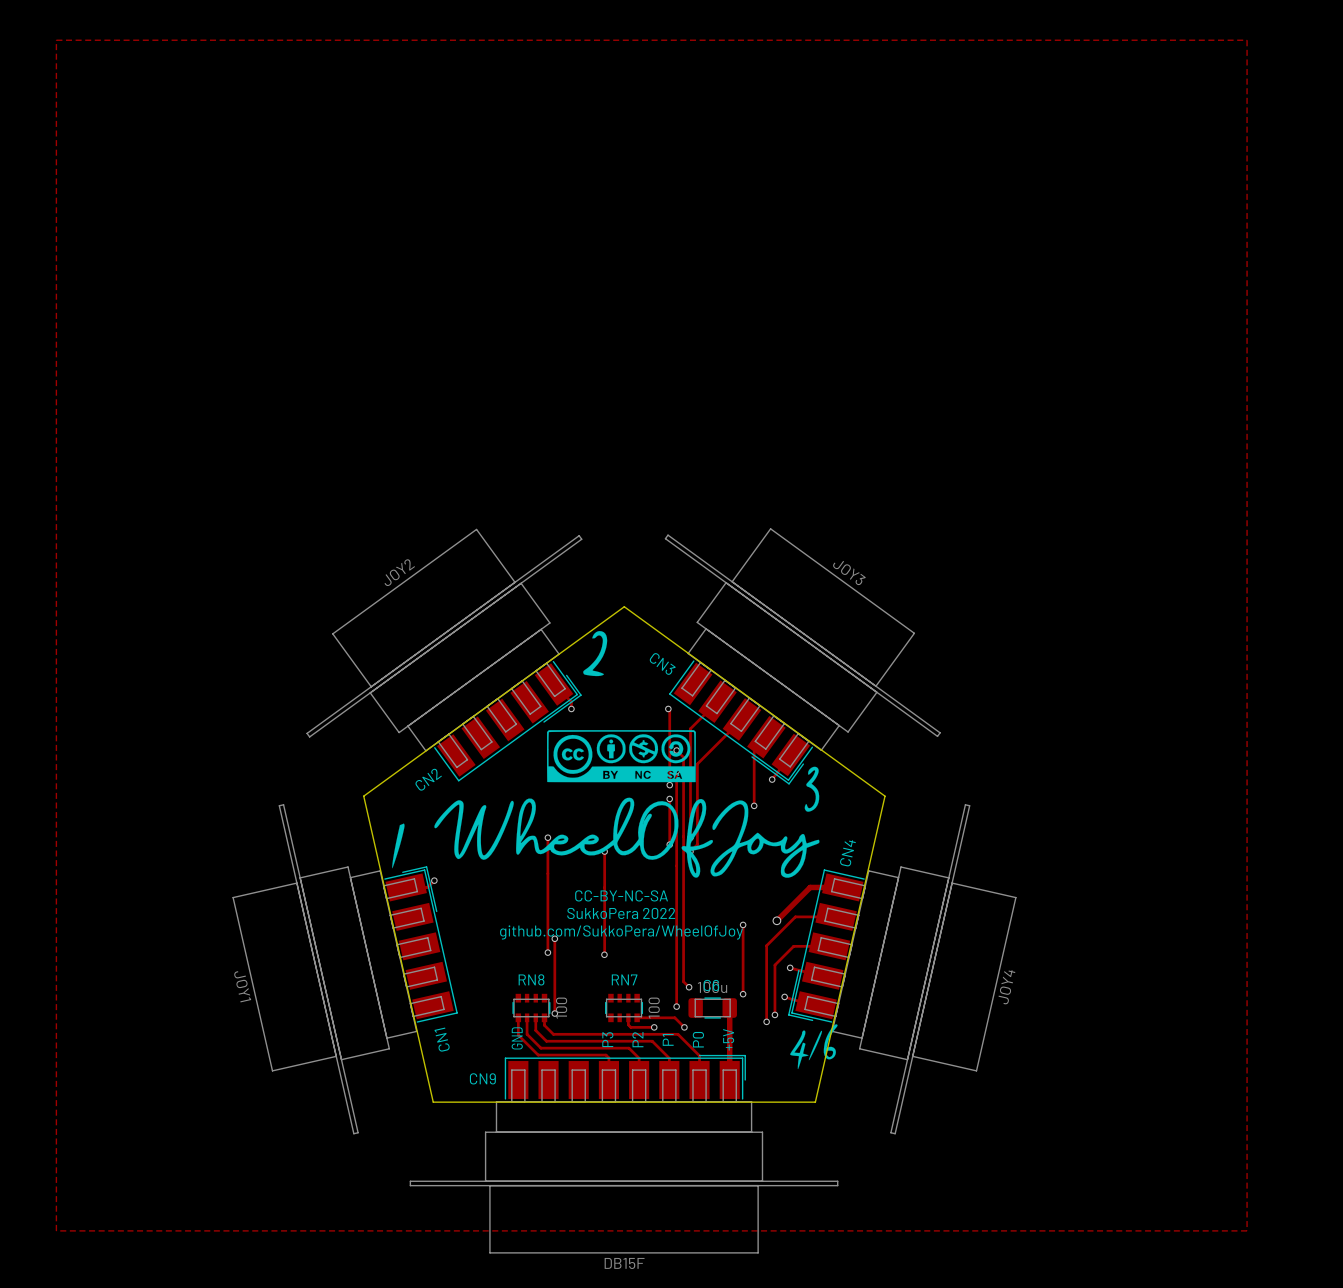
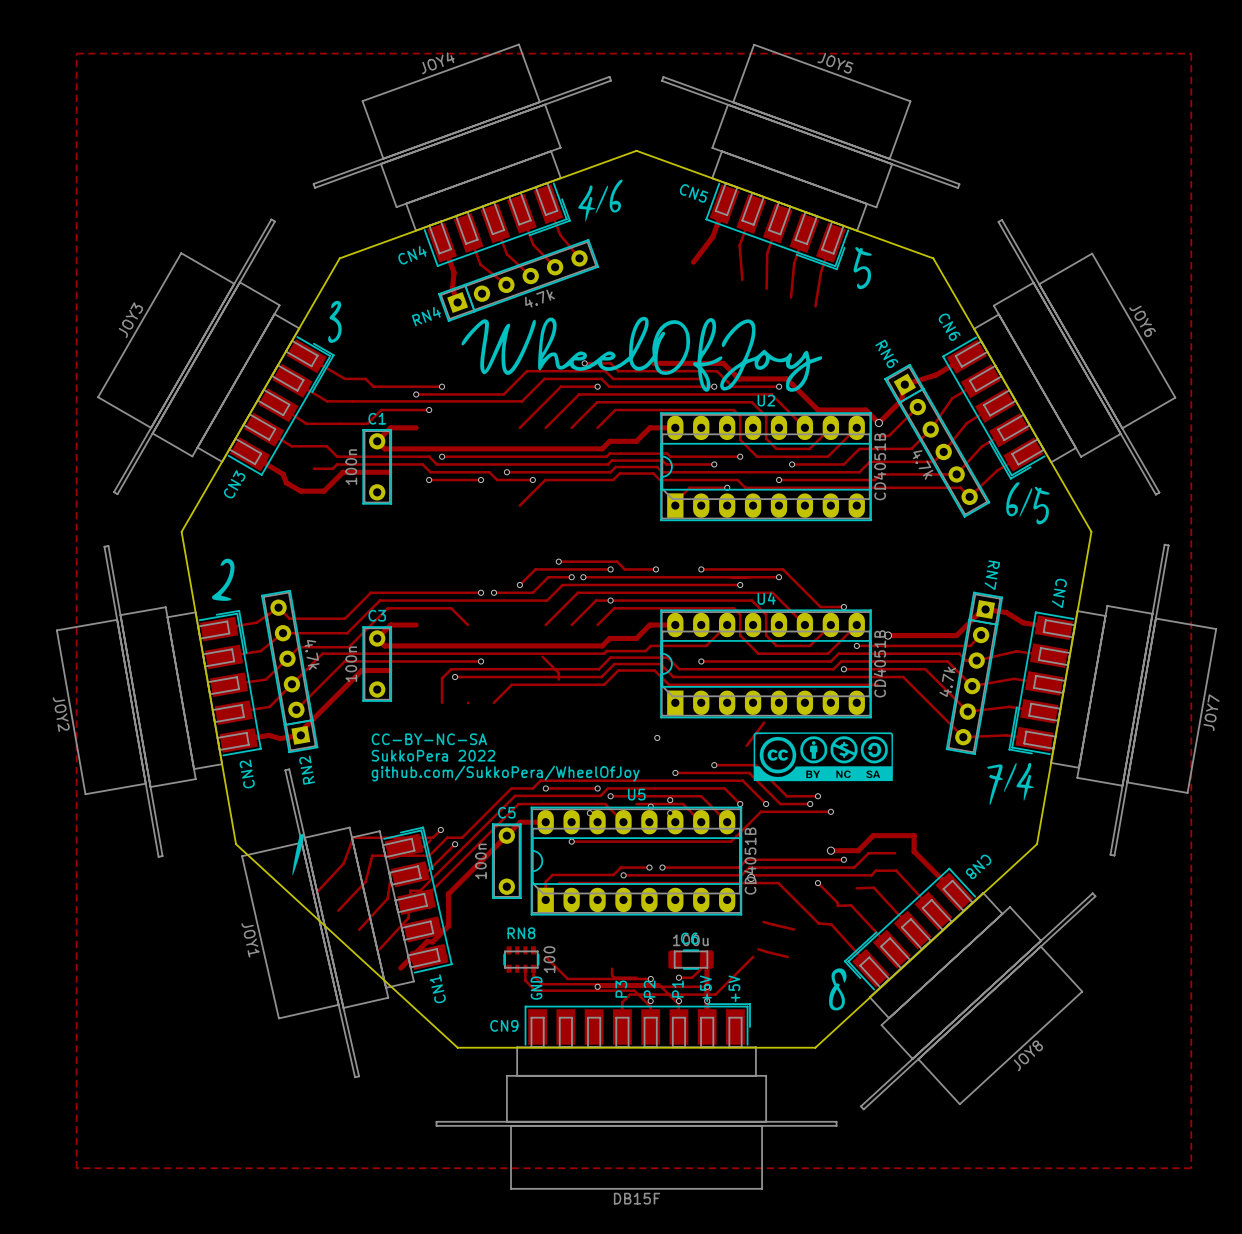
CN5: none -> JOY5 (810, 157)
drawing: none -> [578, 179, 623, 222]
track: none -> (548, 204) (560, 235) (579, 258)
track: none -> (724, 204) (712, 237) (693, 262)
track: none -> (521, 213) (533, 244) (555, 267)
track: none -> (751, 213) (739, 245) (742, 279)
track: none -> (495, 223) (506, 254) (530, 276)
track: none -> (777, 223) (767, 253) (766, 288)
track: none -> (468, 233) (480, 264) (506, 284)
track: none -> (804, 233) (794, 263) (791, 297)
track: none -> (830, 242) (821, 271) (815, 306)
drawing: none -> [853, 247, 872, 290]
track: none -> (442, 249) (442, 242) (454, 272) (452, 288) (457, 302)
RN4: none -> 4.7k (518, 280)
drawing: none -> [328, 300, 342, 343]
drawing: none -> [461, 316, 823, 392]
track: none -> (306, 356) (344, 378) (365, 378) (373, 386) (442, 386)
track: none -> (966, 356) (935, 375) (904, 384) (902, 387) (902, 399) (878, 422) (865, 410) (817, 410) (786, 378) (738, 378) (723, 363) (653, 363)
CN6: none -> JOY6 (1059, 357)
track: none -> (584, 363) (610, 363) (618, 371) (716, 371) (732, 386) (779, 386)
via: none -> (584, 363)
track: none -> (701, 378) (613, 378) (605, 371) (527, 371) (503, 394) (416, 394)
track: none -> (292, 380) (327, 401) (522, 401) (544, 378) (601, 378) (609, 386) (714, 386)
track: none -> (980, 381) (952, 398) (930, 429) (911, 448) (859, 448) (843, 464) (792, 464)
via: none -> (442, 386)
track: none -> (597, 386) (560, 386) (519, 427)
via: none -> (597, 386)
via: none -> (714, 386)
via: none -> (779, 386)
via: none -> (416, 394)
track: none -> (278, 405) (306, 423) (367, 423) (381, 410) (429, 410)
track: none -> (995, 405) (966, 423) (933, 461) (869, 461) (859, 472) (662, 472) (657, 467) (615, 467) (610, 472) (506, 472)
track: none -> (917, 407) (888, 435) (878, 435)
via: none -> (429, 410)
via: none -> (878, 422)
track: none -> (416, 427) (390, 427) (377, 441) (384, 448) (602, 448) (609, 441) (636, 441) (649, 427) (675, 427)
track: none -> (545, 427) (579, 394) (771, 394) (804, 427)
track: none -> (571, 427) (597, 402) (751, 402) (766, 416) (766, 438) (776, 448) (809, 448) (830, 427)
track: none -> (597, 427) (615, 410) (733, 410) (740, 416) (740, 439) (757, 456) (827, 456) (856, 427)
track: none -> (264, 429) (291, 446) (326, 446) (337, 456) (429, 456) (436, 464) (608, 464) (611, 460) (662, 460) (666, 464) (714, 464)
track: none -> (1009, 430) (981, 446) (956, 474) (880, 474) (875, 480) (779, 480)
RN6: none -> 4.7k (937, 440)
track: none -> (250, 454) (283, 474) (286, 482) (300, 491) (324, 491) (343, 472) (389, 472)
track: none -> (1023, 454) (996, 470) (969, 496) (960, 487) (745, 487) (737, 480) (659, 480) (653, 473) (619, 473) (613, 480) (545, 480) (519, 505)
track: none -> (442, 456) (606, 456) (609, 453) (667, 453) (670, 456) (740, 456)
via: none -> (442, 456)
via: none -> (740, 456)
via: none -> (714, 464)
via: none -> (792, 464)
C1: none -> 100n (377, 466)
U2: none -> CD4051B (766, 466)
track: none -> (313, 468) (332, 468) (337, 464) (422, 464) (430, 472) (489, 472) (497, 480) (532, 480)
via: none -> (506, 472)
track: none -> (429, 480) (481, 480)
via: none -> (429, 480)
via: none -> (481, 480)
via: none -> (532, 480)
via: none -> (779, 480)
drawing: none -> [1006, 482, 1050, 525]
track: none -> (727, 487) (689, 487) (675, 502) (675, 505)
via: none -> (727, 487)
drawing: none -> [212, 558, 235, 601]
track: none -> (558, 561) (617, 561) (624, 569) (655, 569)
via: none -> (558, 561)
track: none -> (610, 569) (535, 569) (519, 585)
via: none -> (610, 569)
via: none -> (655, 569)
track: none -> (701, 569) (782, 569) (820, 607) (843, 607)
via: none -> (701, 569)
track: none -> (571, 577) (548, 577) (532, 592) (493, 592)
via: none -> (571, 577)
track: none -> (583, 577) (779, 577)
via: none -> (583, 577)
via: none -> (779, 577)
via: none -> (519, 585)
track: none -> (740, 585) (562, 585) (547, 600) (379, 600) (347, 633) (283, 633) (260, 651) (224, 656)
via: none -> (740, 585)
track: none -> (481, 592) (370, 592) (344, 618) (289, 618) (278, 607) (256, 622) (219, 629)
via: none -> (481, 592)
via: none -> (493, 592)
via: none -> (610, 600)
drawing: [583, 631, 608, 677] -> none
via: none -> (843, 607)
track: none -> (416, 625) (390, 625) (377, 638) (384, 645) (602, 645) (609, 638) (636, 638) (649, 625) (675, 625)
track: none -> (467, 625) (451, 608) (387, 608) (348, 647) (299, 647) (265, 679) (228, 684)
track: none -> (545, 625) (577, 592) (772, 592) (804, 625)
track: none -> (571, 625) (596, 600) (751, 600) (766, 614) (766, 635) (776, 645) (809, 645) (830, 625)
track: none -> (597, 625) (614, 608) (733, 608) (740, 614) (740, 635) (758, 653) (828, 653) (856, 625)
track: none -> (727, 625) (706, 645) (650, 645) (645, 651) (606, 651) (604, 653) (322, 653) (269, 706) (233, 712)
track: none -> (1053, 627) (1023, 622) (1006, 612) (982, 609) (956, 635) (887, 635)
CN2 rotation: 0° (444, 655) -> 63.9° counterclockwise (158, 701)
CN2 position: (444, 655) -> (158, 701)
CN3 rotation: 0° (802, 656) -> 96° counterclockwise (215, 356)
CN3 position: (802, 656) -> (215, 356)
via: none -> (887, 635)
track: none -> (981, 635) (970, 645) (856, 645)
via: none -> (856, 645)
track: none -> (1049, 655) (1016, 651) (976, 660) (966, 660) (959, 653) (838, 653) (830, 661) (701, 661)
track: none -> (481, 661) (344, 661) (296, 709)
via: none -> (481, 661)
via: none -> (701, 661)
C3: none -> 100n (377, 664)
U4: none -> CD4051B (766, 663)
track: none -> (843, 669) (925, 669) (967, 711) (1009, 706) (1039, 711)
via: none -> (843, 669)
track: none -> (389, 670) (361, 670) (300, 731) (300, 735) (280, 738) (268, 735) (238, 740)
RN2: none -> 4.7k (289, 671)
track: (717, 701) (690, 728) (690, 839) -> none
track: none -> (455, 677) (601, 677) (614, 664) (660, 664) (673, 677) (903, 677) (963, 737) (1006, 735) (1034, 739)
via: none -> (455, 677)
via: (571, 708) -> none
track: (668, 708) (669, 785) -> none
via: (668, 708) -> none
track: none -> (1044, 683) (1013, 678) (972, 686) (947, 661) (841, 661) (833, 669) (679, 669) (667, 657) (610, 657) (598, 669) (451, 669) (442, 678) (442, 702)
track: none -> (877, 684) (668, 684) (654, 670) (618, 670) (604, 684) (511, 684) (493, 702)
track: (741, 719) (697, 764) (697, 844) (690, 851) -> none
CN7: none -> JOY7 (1112, 700)
track: none -> (467, 702) (467, 703)
track: (766, 737) (754, 749) (754, 805) -> none
track: (676, 750) (683, 757) (683, 981) (689, 987) -> none
via: (676, 750) -> none
drawing position: (621, 756) -> (823, 756)
drawing: [434, 766, 820, 878] -> none
track: (676, 771) (676, 1006) -> none
text: none -> CC-BY-NC-SA (429, 739)
via: (772, 779) -> none
via: (669, 785) -> none
text: none -> SukkoPera 2022 (433, 755)
drawing: none -> [987, 762, 1035, 806]
via: (669, 798) -> none
track: (669, 799) (669, 844) -> none
track: none -> (714, 765) (755, 765) (786, 796) (817, 796)
CN4 footprint: [788, 804, 1017, 1135] -> [313, 44, 612, 267]
via position: (754, 805) -> (714, 765)
track: none -> (675, 772) (749, 772) (780, 804) (810, 804)
via: none -> (675, 772)
text: none -> github.com/SukkoPera/WheelOfJoy (505, 773)
track: none -> (545, 788) (597, 788)
via: none -> (597, 788)
track: none -> (610, 796) (701, 796) (727, 822)
via: none -> (610, 796)
via: none -> (817, 796)
track: (547, 837) (547, 952) -> none
via position: (547, 837) -> (545, 788)
track: none -> (636, 804) (683, 804) (701, 822)
track: none -> (740, 804) (724, 788) (608, 788) (600, 795) (515, 795) (420, 890) (410, 890) (408, 918) (379, 948)
via: none -> (740, 804)
track: none -> (766, 804) (742, 780) (540, 780) (532, 788) (511, 788) (462, 837) (447, 837) (429, 855) (372, 855) (365, 881) (338, 910)
via: none -> (766, 804)
via: none -> (810, 804)
drawing position: (398, 845) -> (298, 854)
track: none -> (830, 811) (760, 811) (731, 841) (571, 841)
via: none -> (830, 811)
track: (604, 851) (604, 954) -> none
CN4 name position: CN4 (847, 853) -> CN4 (412, 255)
track: none -> (545, 822) (520, 822) (448, 893) (448, 925) (432, 941) (426, 941) (400, 968)
track: none -> (623, 822) (605, 804) (518, 804) (429, 893) (429, 908)
track: none -> (440, 829) (433, 837) (353, 837) (343, 863) (317, 891)
via: none -> (440, 829)
via: (434, 880) -> none
via: none -> (571, 841)
track: none -> (455, 844) (426, 873) (391, 873) (387, 898) (359, 929)
via: none -> (455, 844)
track: (842, 887) (810, 887) (776, 920) -> none
track: none -> (830, 850) (858, 850) (873, 835) (914, 835) (914, 851) (954, 891)
via: none -> (830, 850)
track: none -> (895, 853) (868, 853) (854, 867) (749, 867) (741, 875) (623, 875)
text: CC-BY-NC-SA (621, 895) -> none
track: none -> (843, 859) (746, 859) (738, 867) (662, 867)
via: none -> (843, 859)
C5: none -> 100n (506, 861)
U5: none -> CD4051B (636, 861)
track: none -> (649, 867) (620, 867) (613, 874) (552, 874) (545, 881) (545, 899)
via: none -> (649, 867)
via: none -> (662, 867)
text: SukkoPera 2022 (621, 913) -> none
track: (836, 916) (795, 916) (766, 945) (766, 1021) -> none
via: none -> (623, 875)
track: none -> (753, 875) (871, 875) (875, 870) (896, 870) (933, 910)
track: (743, 924) (743, 994) -> none
via: (743, 924) -> none
track: none -> (558, 883) (778, 883) (818, 923) (831, 924) (871, 968)
track: none -> (817, 883) (837, 902) (837, 905) (851, 905) (891, 949)
via: none -> (817, 883)
track: none -> (856, 888) (873, 887) (912, 930)
text: github.com/SukkoPera/WheelOfJoy (621, 932) -> none
track: (554, 938) (554, 1013) -> none
via: (554, 938) -> none
track: (829, 946) (793, 946) (774, 965) (774, 1014) -> none
via: (547, 952) -> none
via: (604, 954) -> none
via: (790, 967) -> none
RN7 name position: RN7 (624, 979) -> RN7 (992, 575)
via: (689, 987) -> none
CN4 value position: JOY4 (1006, 987) -> JOY4 (438, 63)
RN7 footprint: [605, 993, 644, 1023] -> [946, 591, 1003, 755]
via: (743, 994) -> none
via: (784, 996) -> none
track: none -> (545, 956) (567, 979) (650, 979)
track: none -> (701, 956) (701, 968) (692, 977) (678, 977)
via: (676, 1006) -> none
RN7 value: 100 (654, 1008) -> 4.7k (947, 681)
via: (554, 1013) -> none
via: (774, 1014) -> none
track: (518, 1017) (518, 1035) (538, 1055) (606, 1055) (608, 1057) (608, 1080) -> none
track: (527, 1017) (527, 1034) (540, 1048) (628, 1048) (639, 1058) (639, 1080) -> (753, 956) (715, 994) (630, 994) (622, 1002) (622, 1026)
track: (637, 1017) (674, 1017) (684, 1027) -> none
drawing: none -> [829, 968, 847, 1011]
via: (766, 1021) -> none
drawing: [790, 1024, 838, 1070] -> none
via: (654, 1027) -> none
via: (684, 1027) -> none
via: none -> (678, 977)
via: none -> (650, 979)
track: none -> (597, 986) (707, 986)
via: none -> (597, 986)
via: none -> (707, 986)
text position: GND (517, 1038) -> GND (536, 988)
text: P3 (607, 1039) -> none
text: P2 (637, 1039) -> P3 (621, 989)
text: P1 (668, 1039) -> P2 (649, 989)
text: P0 (698, 1039) -> P1 (677, 989)
text: none -> +5V (734, 988)
CN8: none -> JOY8 (970, 988)
via: none -> (650, 1001)
via: none -> (678, 1001)
via: none -> (707, 1001)
board edge: (463, 1102) (433, 1102) (363, 796) (624, 606) (885, 796) (815, 1102) -> (457, 1047) (236, 844) (181, 531) (339, 258) (636, 150) (933, 258) (1091, 531) (1037, 844) (815, 1047) (787, 1047)
CN9 position: (624, 1154) -> (636, 1096)

